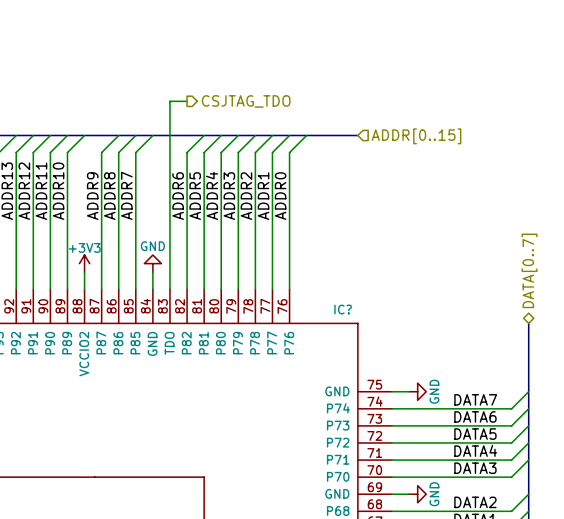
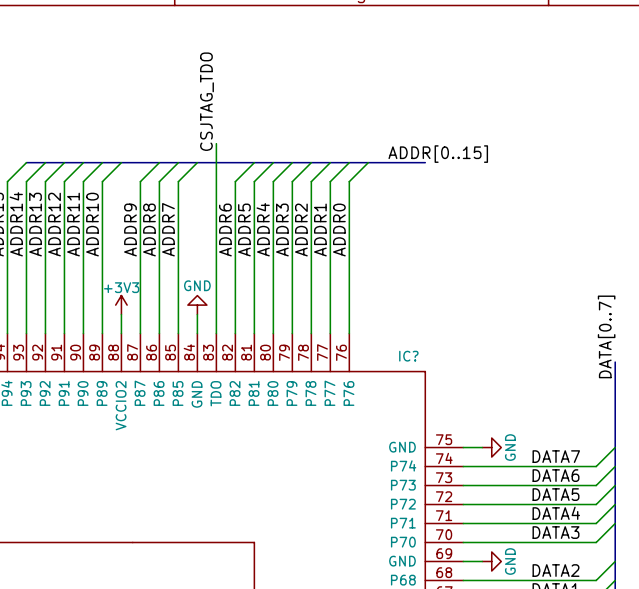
label: none -> CSJTAG_TDO (206, 101)
wire: (187, 101) (169, 101) (169, 118) -> none
hierarchical label: CSJTAG_TDO (246, 101) -> none
label: none -> ADDR[0..15] (438, 154)
hierarchical label: ADDR[0..15] (416, 136) -> none
hierarchical label: DATA[0..7] (529, 270) -> none
label: none -> DATA[0..7] (606, 336)
bus: none -> (615, 362) (615, 371)

